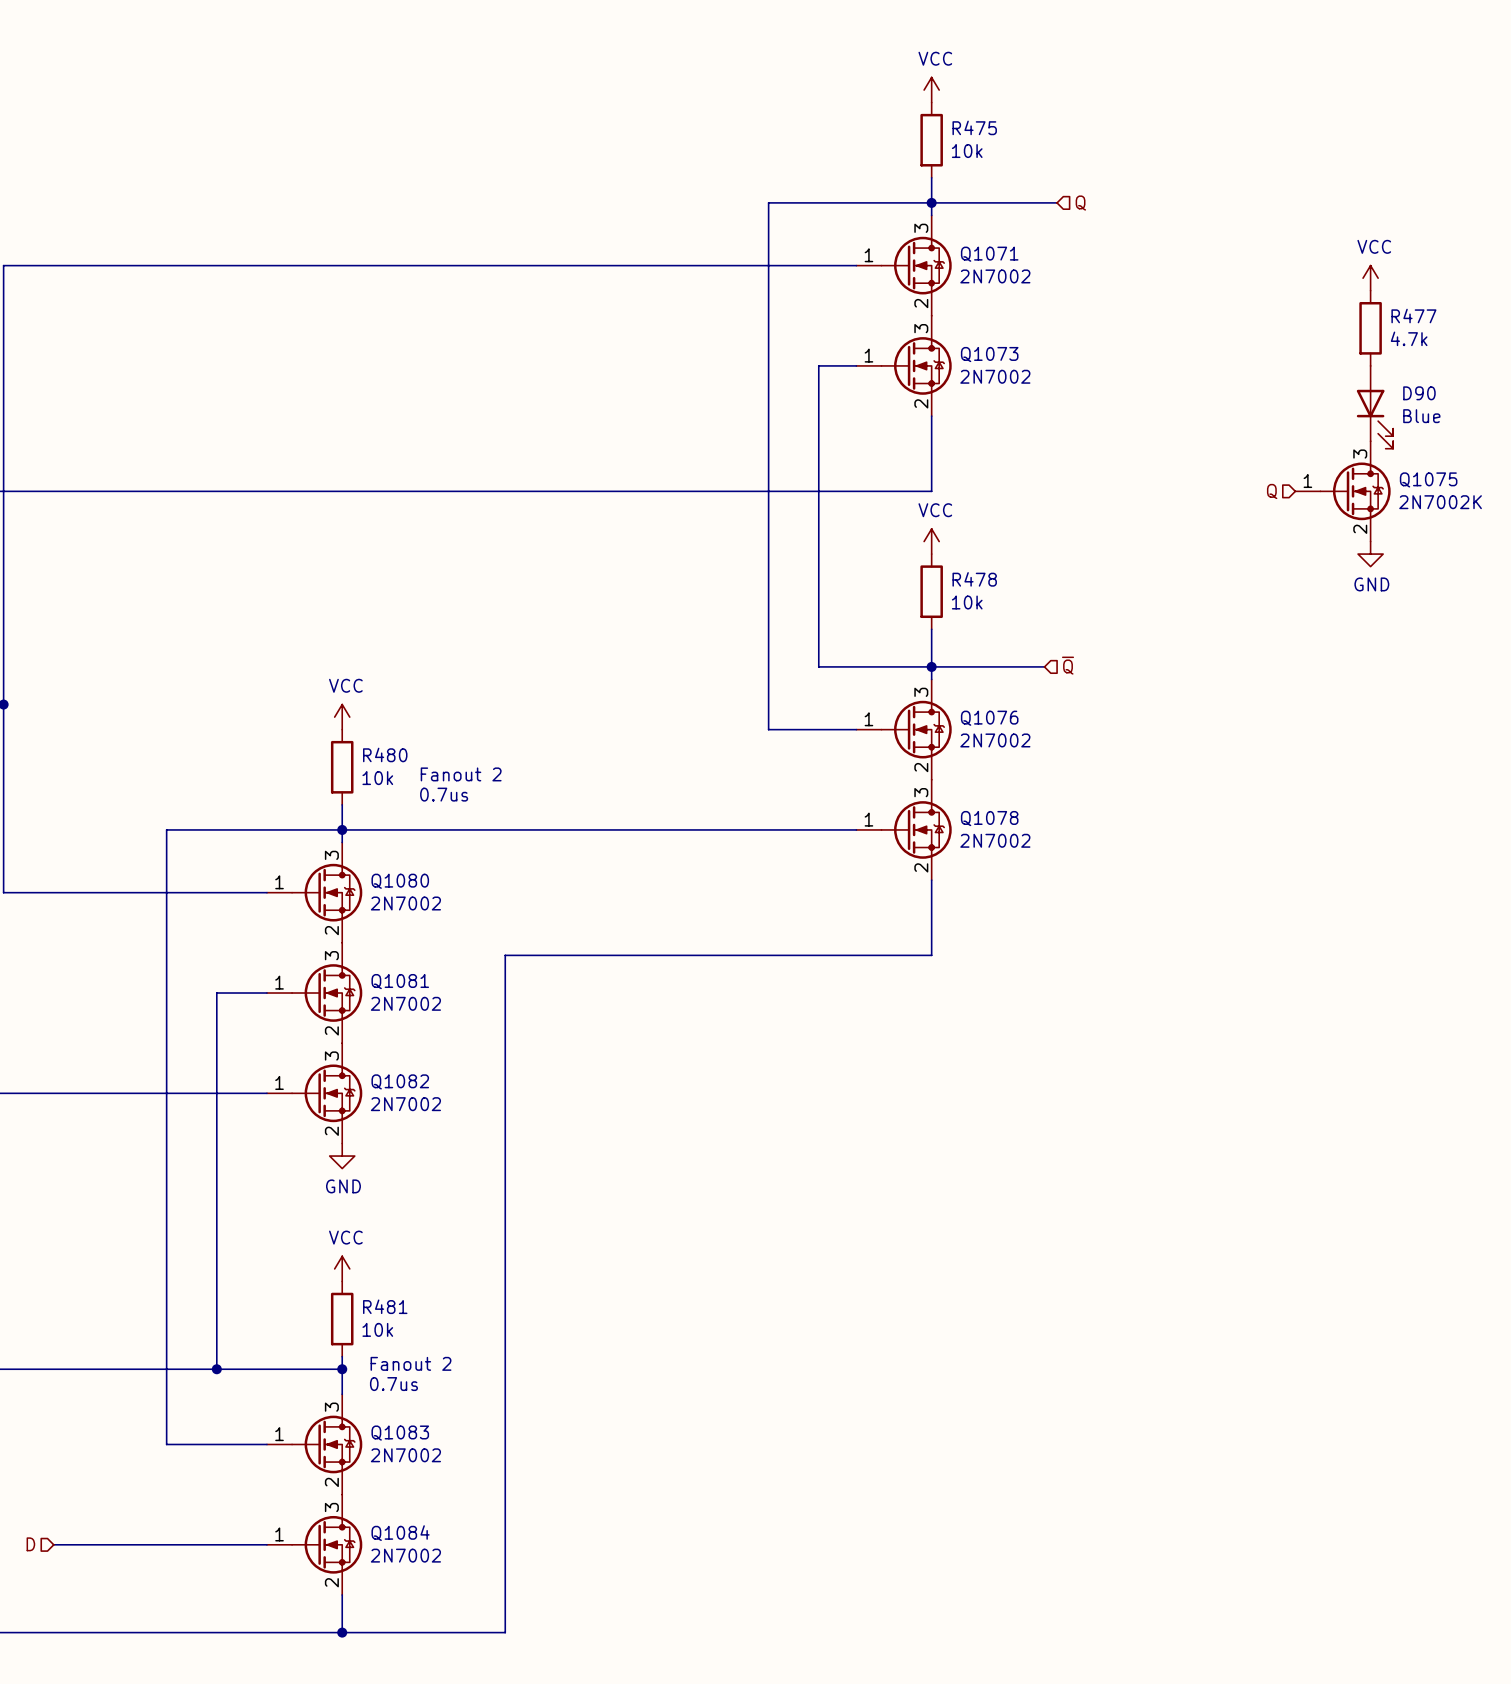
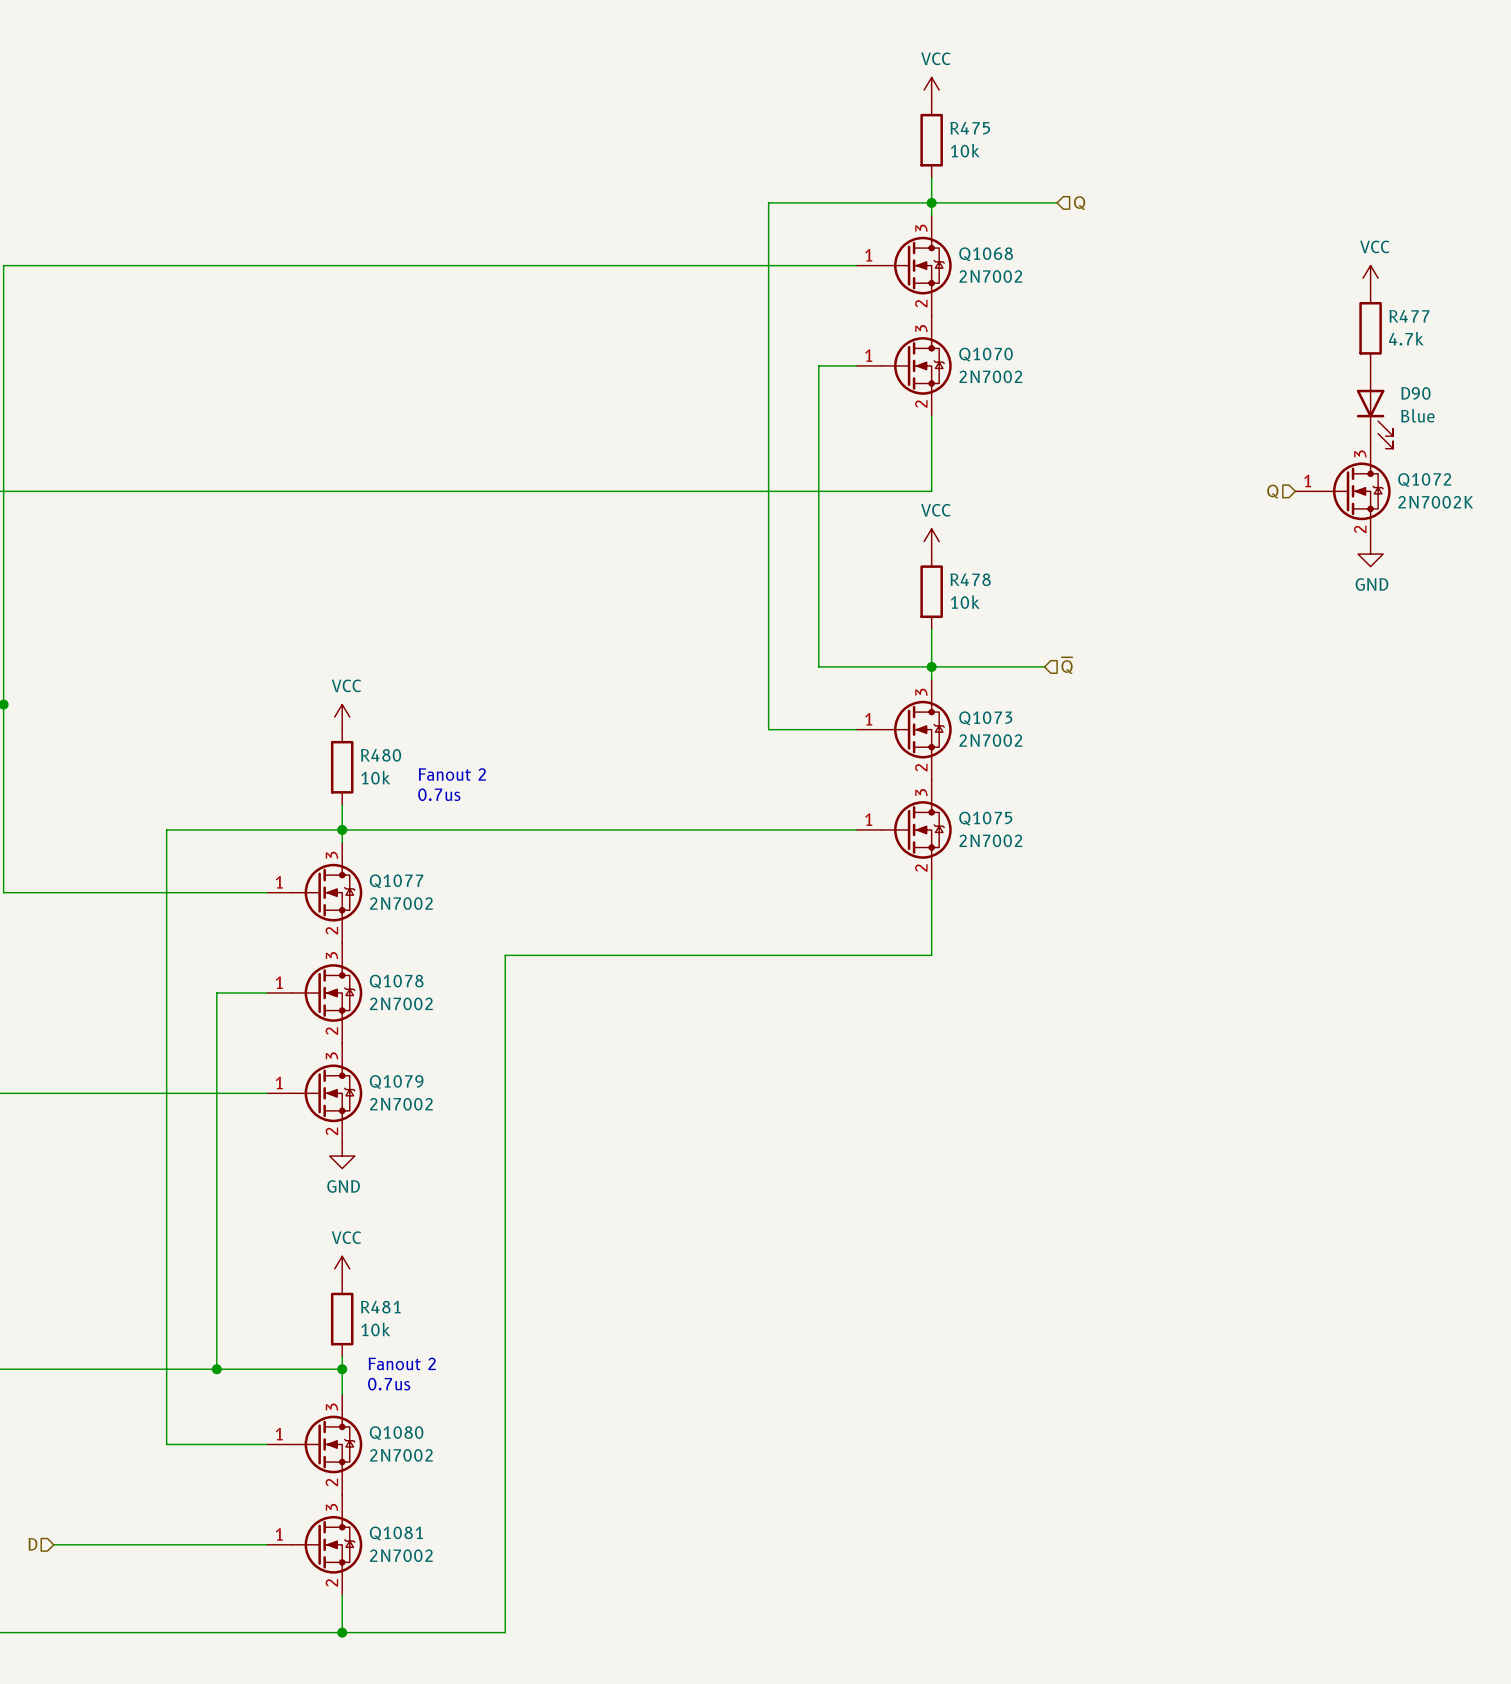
Q1071 name: Q1071 (989, 254) -> Q1068 (986, 254)
Q1073 name: Q1073 (989, 354) -> Q1070 (986, 354)
Q1075 name: Q1075 (1428, 479) -> Q1072 (1424, 479)
Q1076 name: Q1076 (989, 718) -> Q1073 (985, 718)
Q1078 name: Q1078 (989, 818) -> Q1075 (985, 818)
Q1080 name: Q1080 (400, 881) -> Q1077 (396, 881)
Q1081 name: Q1081 (400, 981) -> Q1078 (396, 981)
Q1082 name: Q1082 (400, 1081) -> Q1079 (396, 1081)
Q1083 name: Q1083 (400, 1433) -> Q1080 (396, 1433)
Q1084 name: Q1084 (400, 1533) -> Q1081 (396, 1533)

